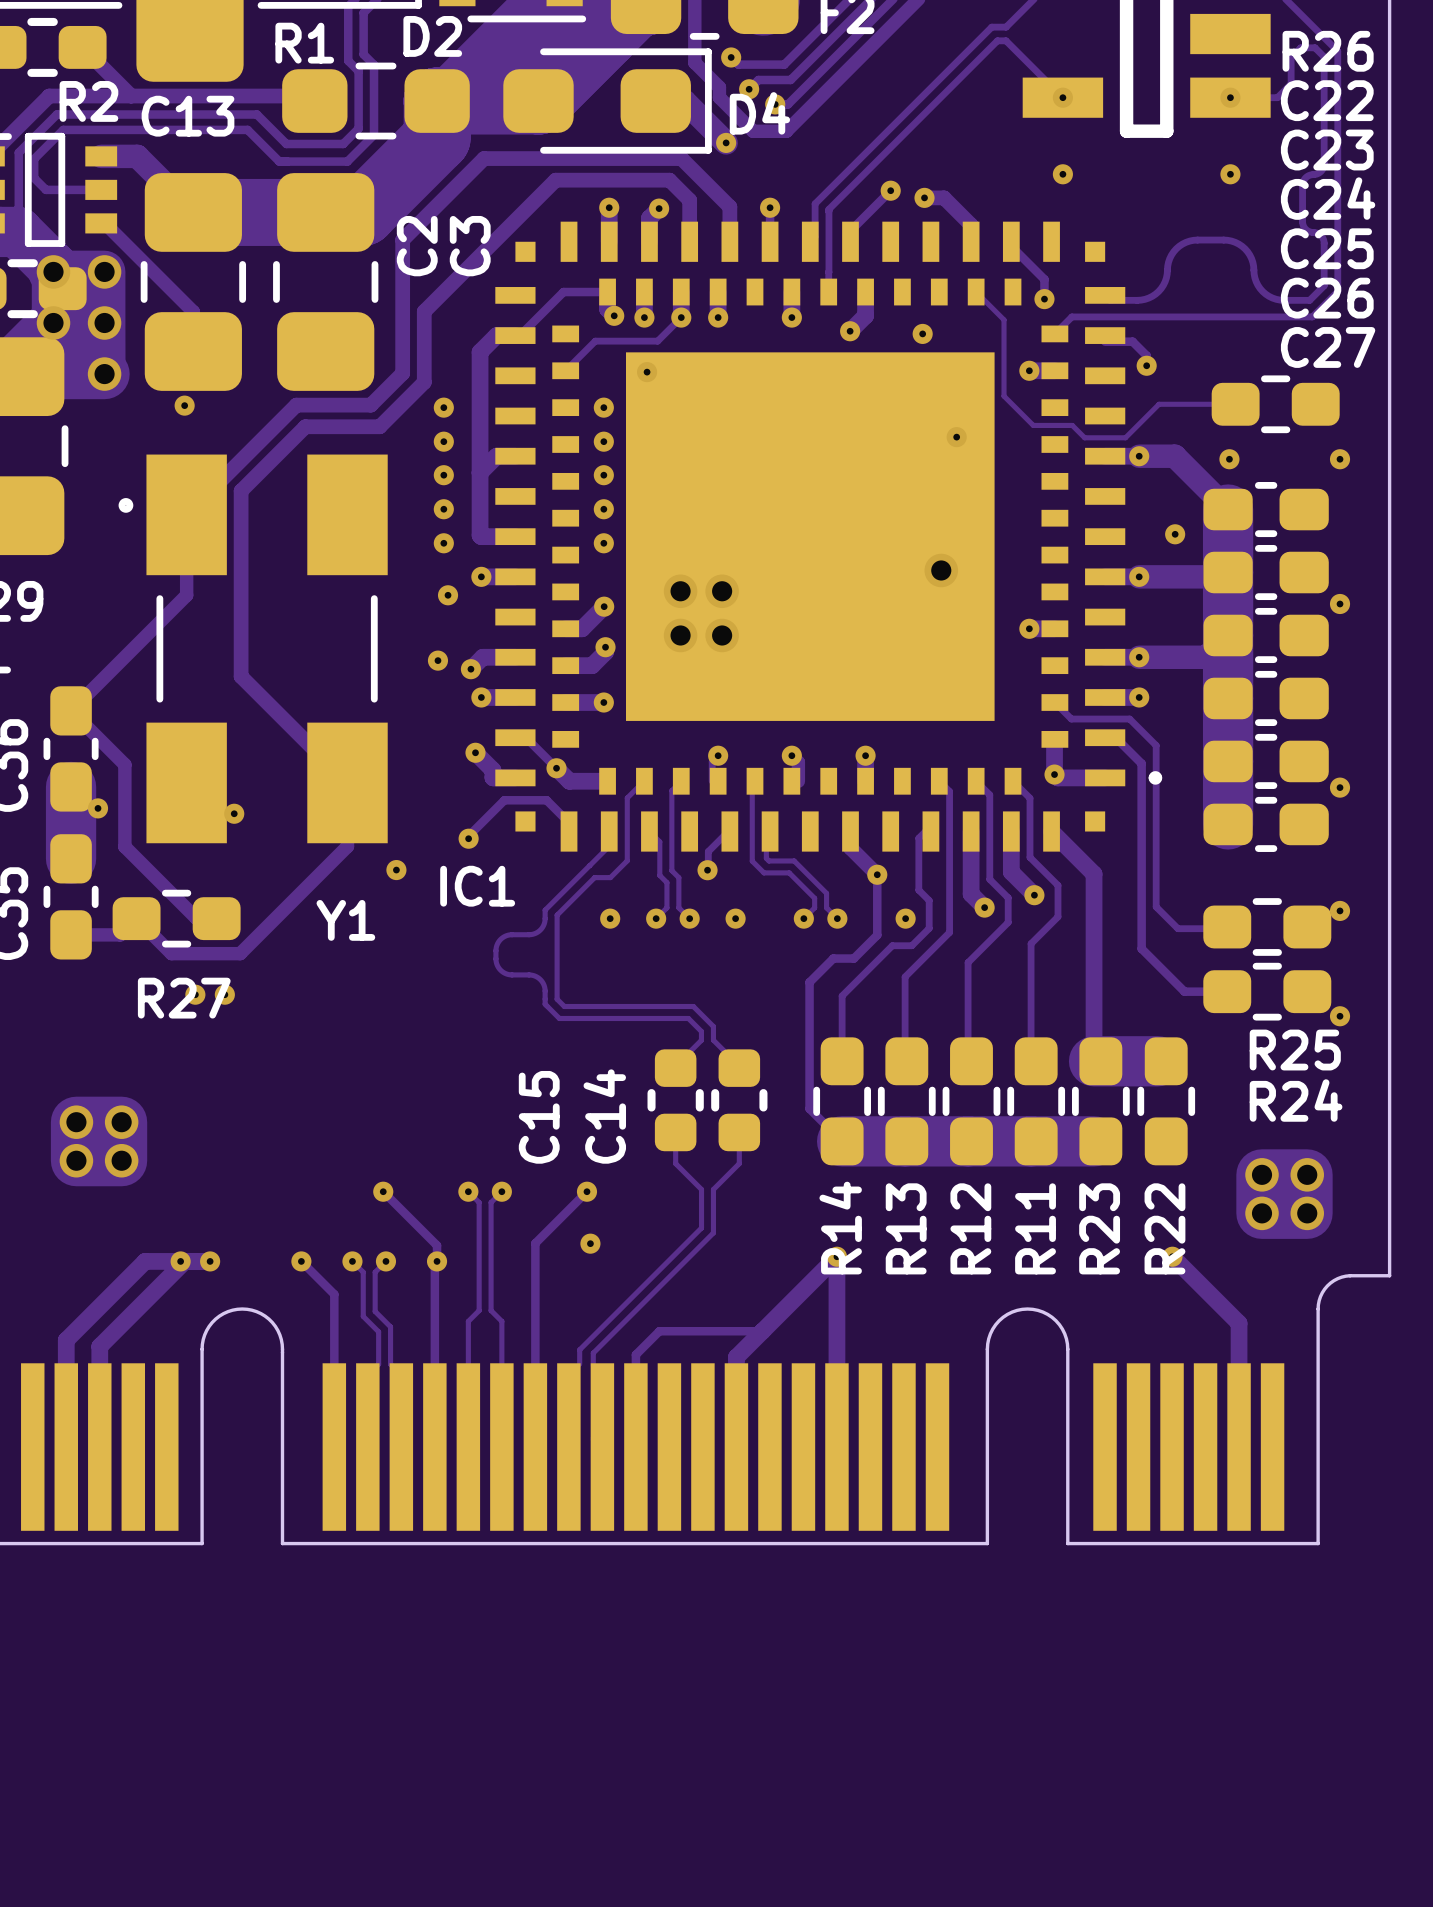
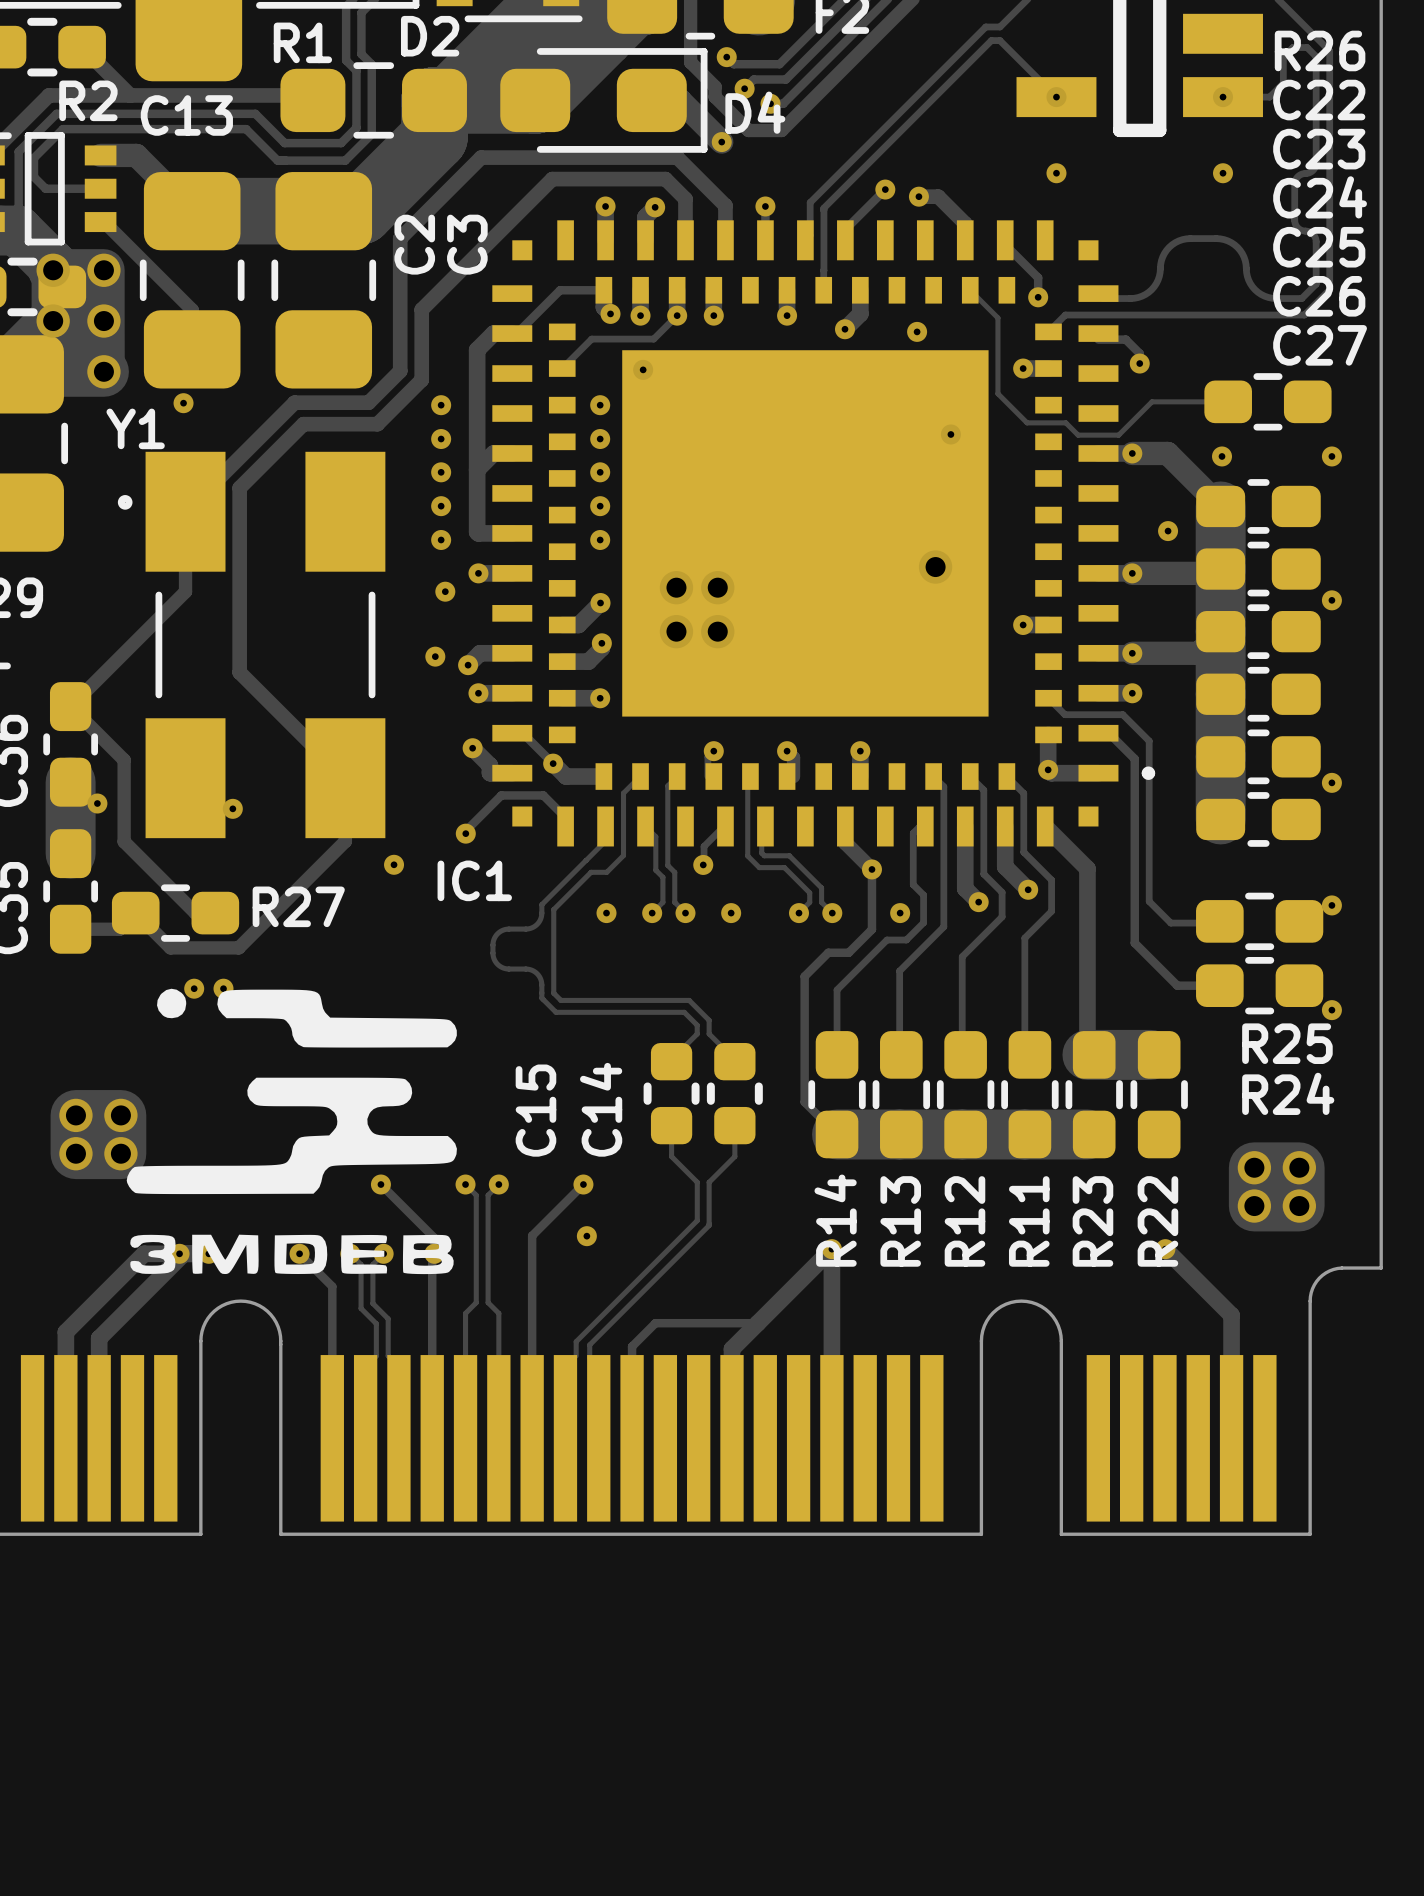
Y1 name position: Y1 (345, 920) -> Y1 (135, 428)
drawing: none -> [126, 988, 457, 1275]
R27 name position: R27 (184, 998) -> R27 (298, 906)

